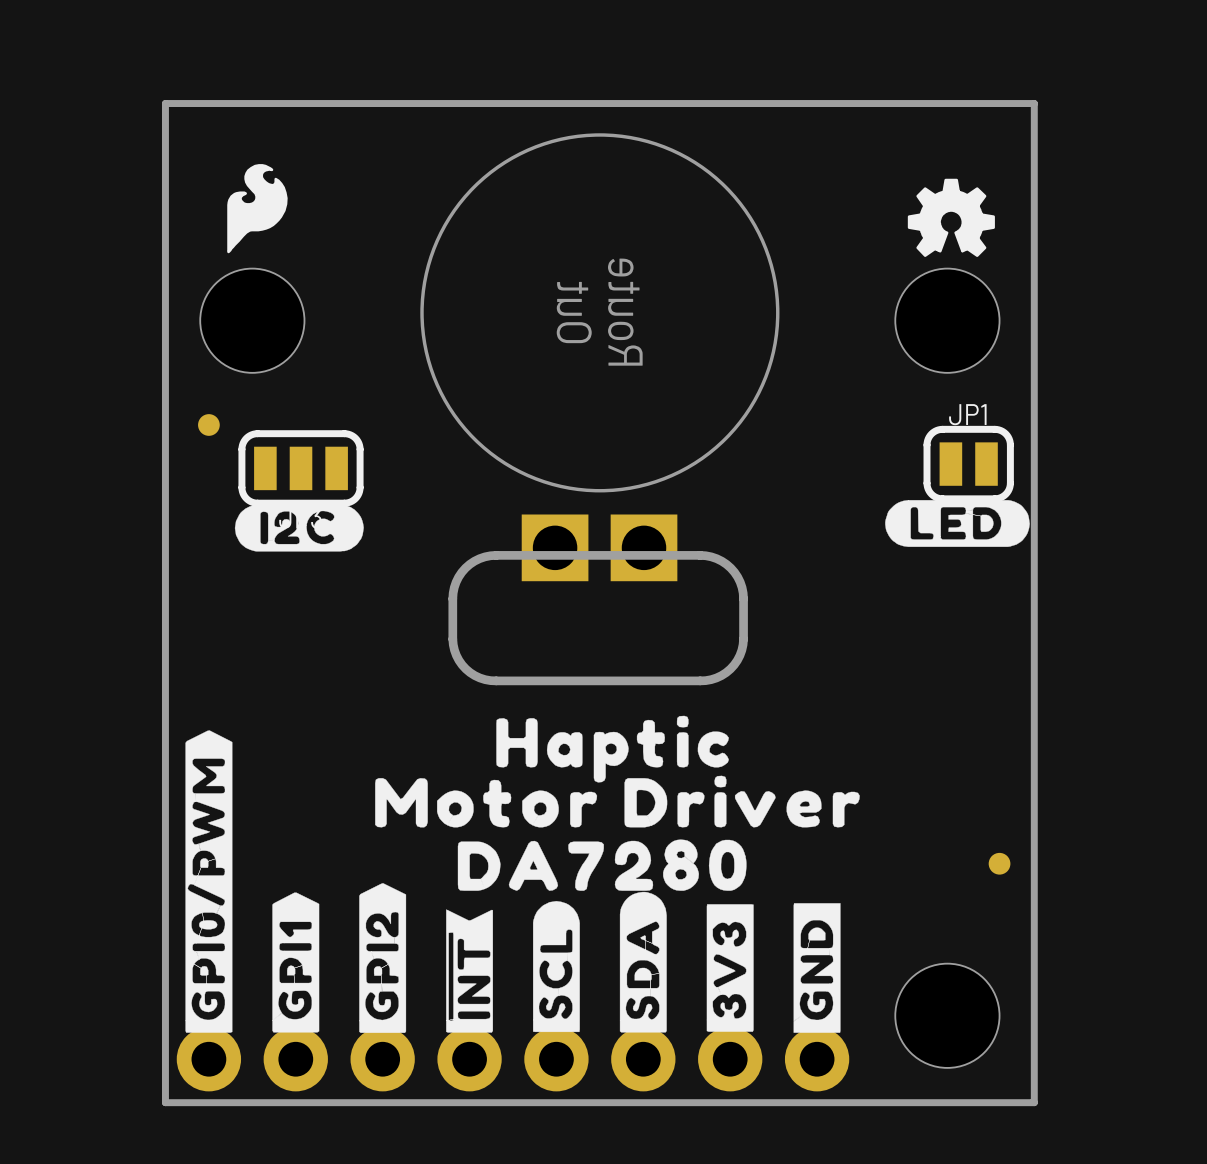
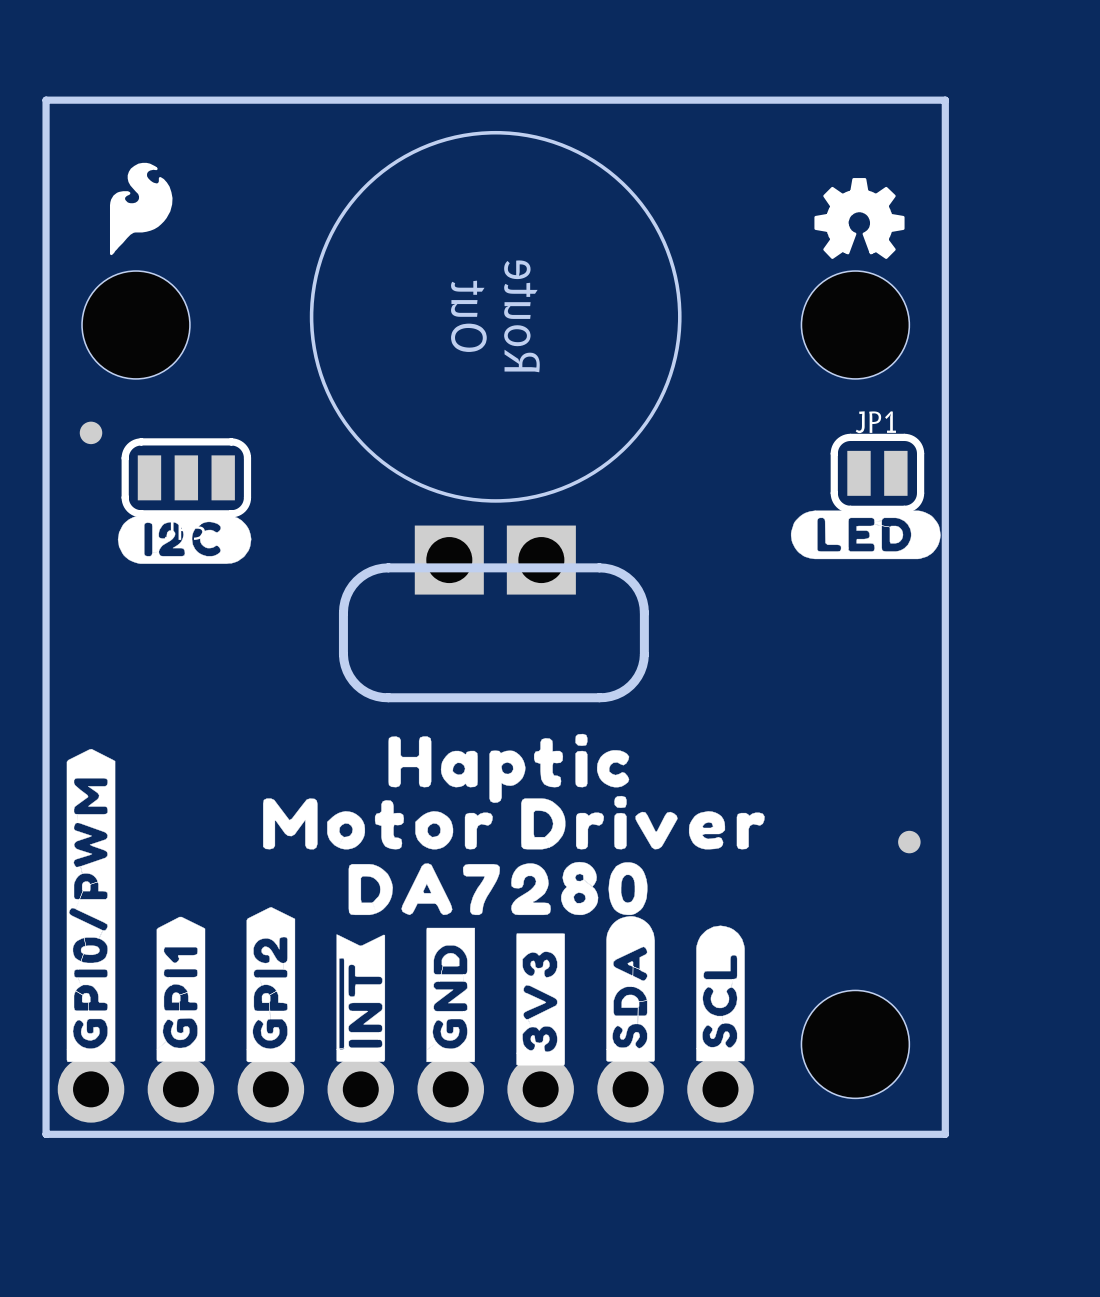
part position: (999, 863) -> (909, 842)
drawing position: (643, 962) -> (630, 988)
drawing position: (556, 966) -> (720, 993)
drawing position: (730, 968) -> (540, 999)
drawing position: (817, 968) -> (450, 994)

